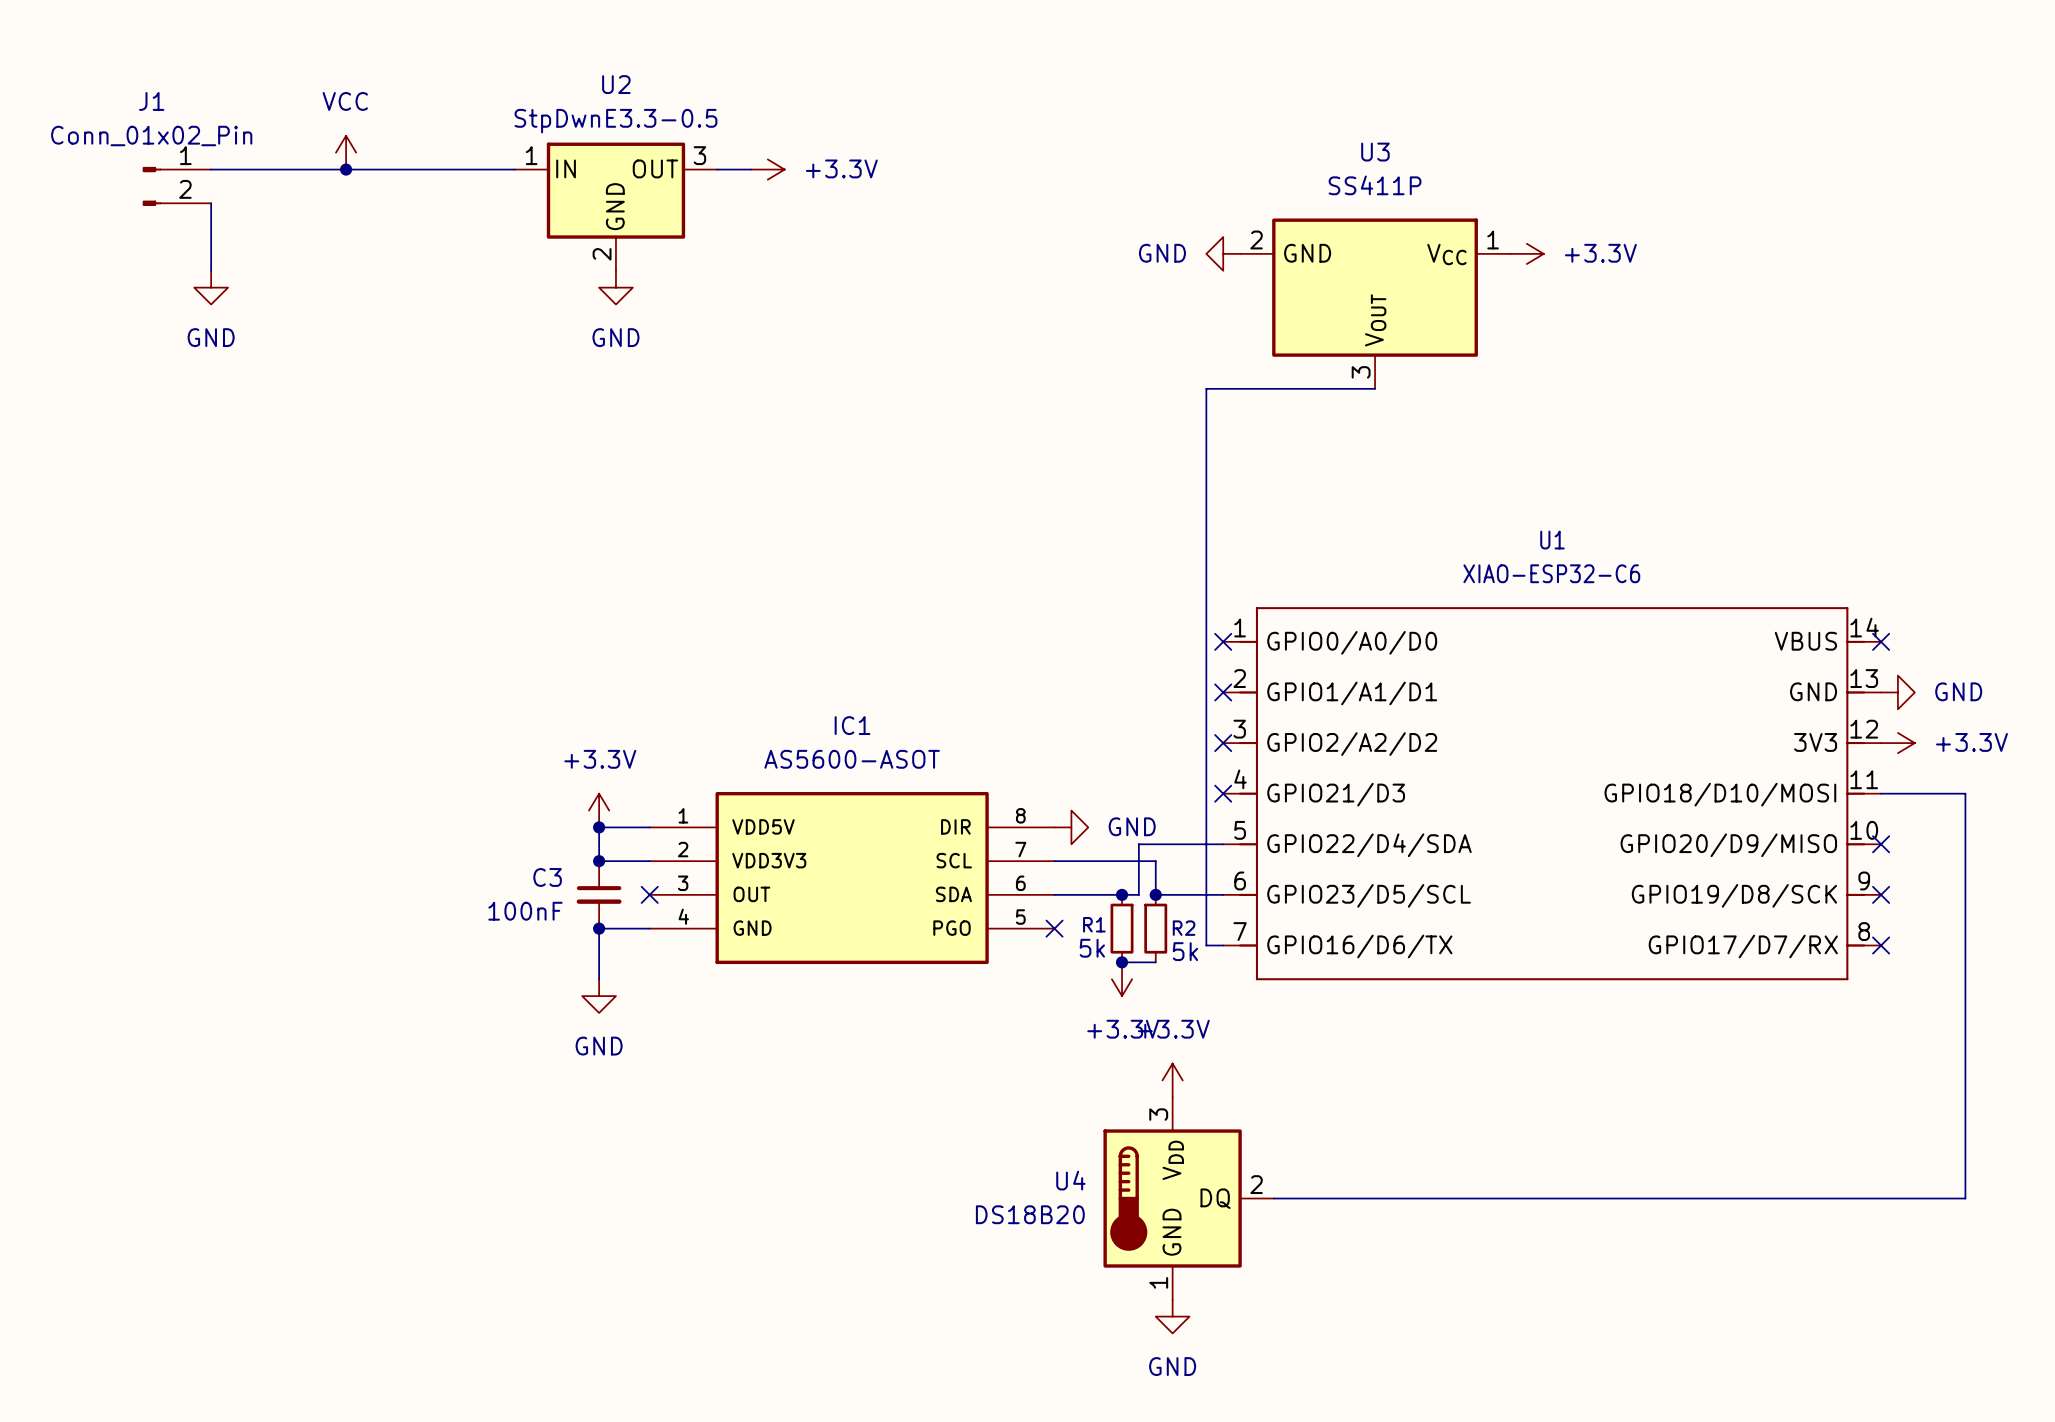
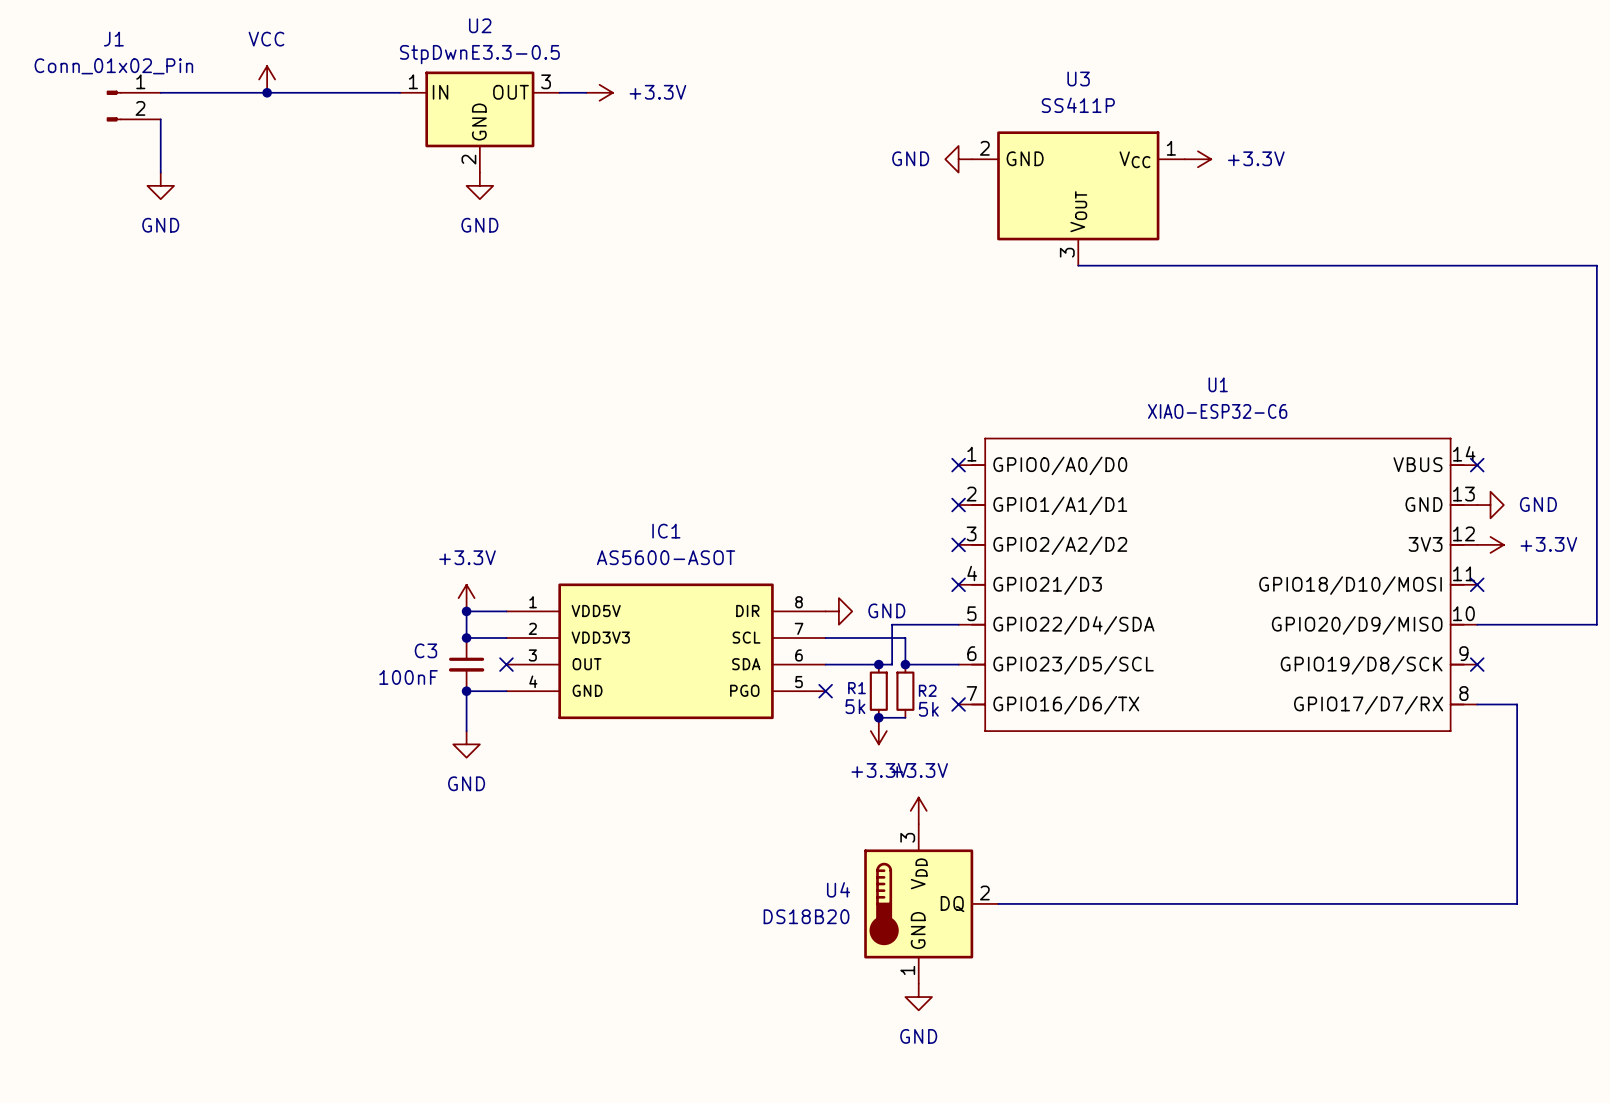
wire: (1375, 388) (1206, 388) (1206, 945) (1223, 945) -> (1078, 265) (1596, 265) (1596, 624) (1477, 624)
wire: (1881, 793) (1965, 793) (1965, 1198) (1931, 1198) -> (1477, 704) (1517, 704) (1517, 903)
no-connect mark position: (1881, 844) -> (1477, 584)
no-connect mark: none -> (958, 704)
no-connect mark: (1881, 945) -> none

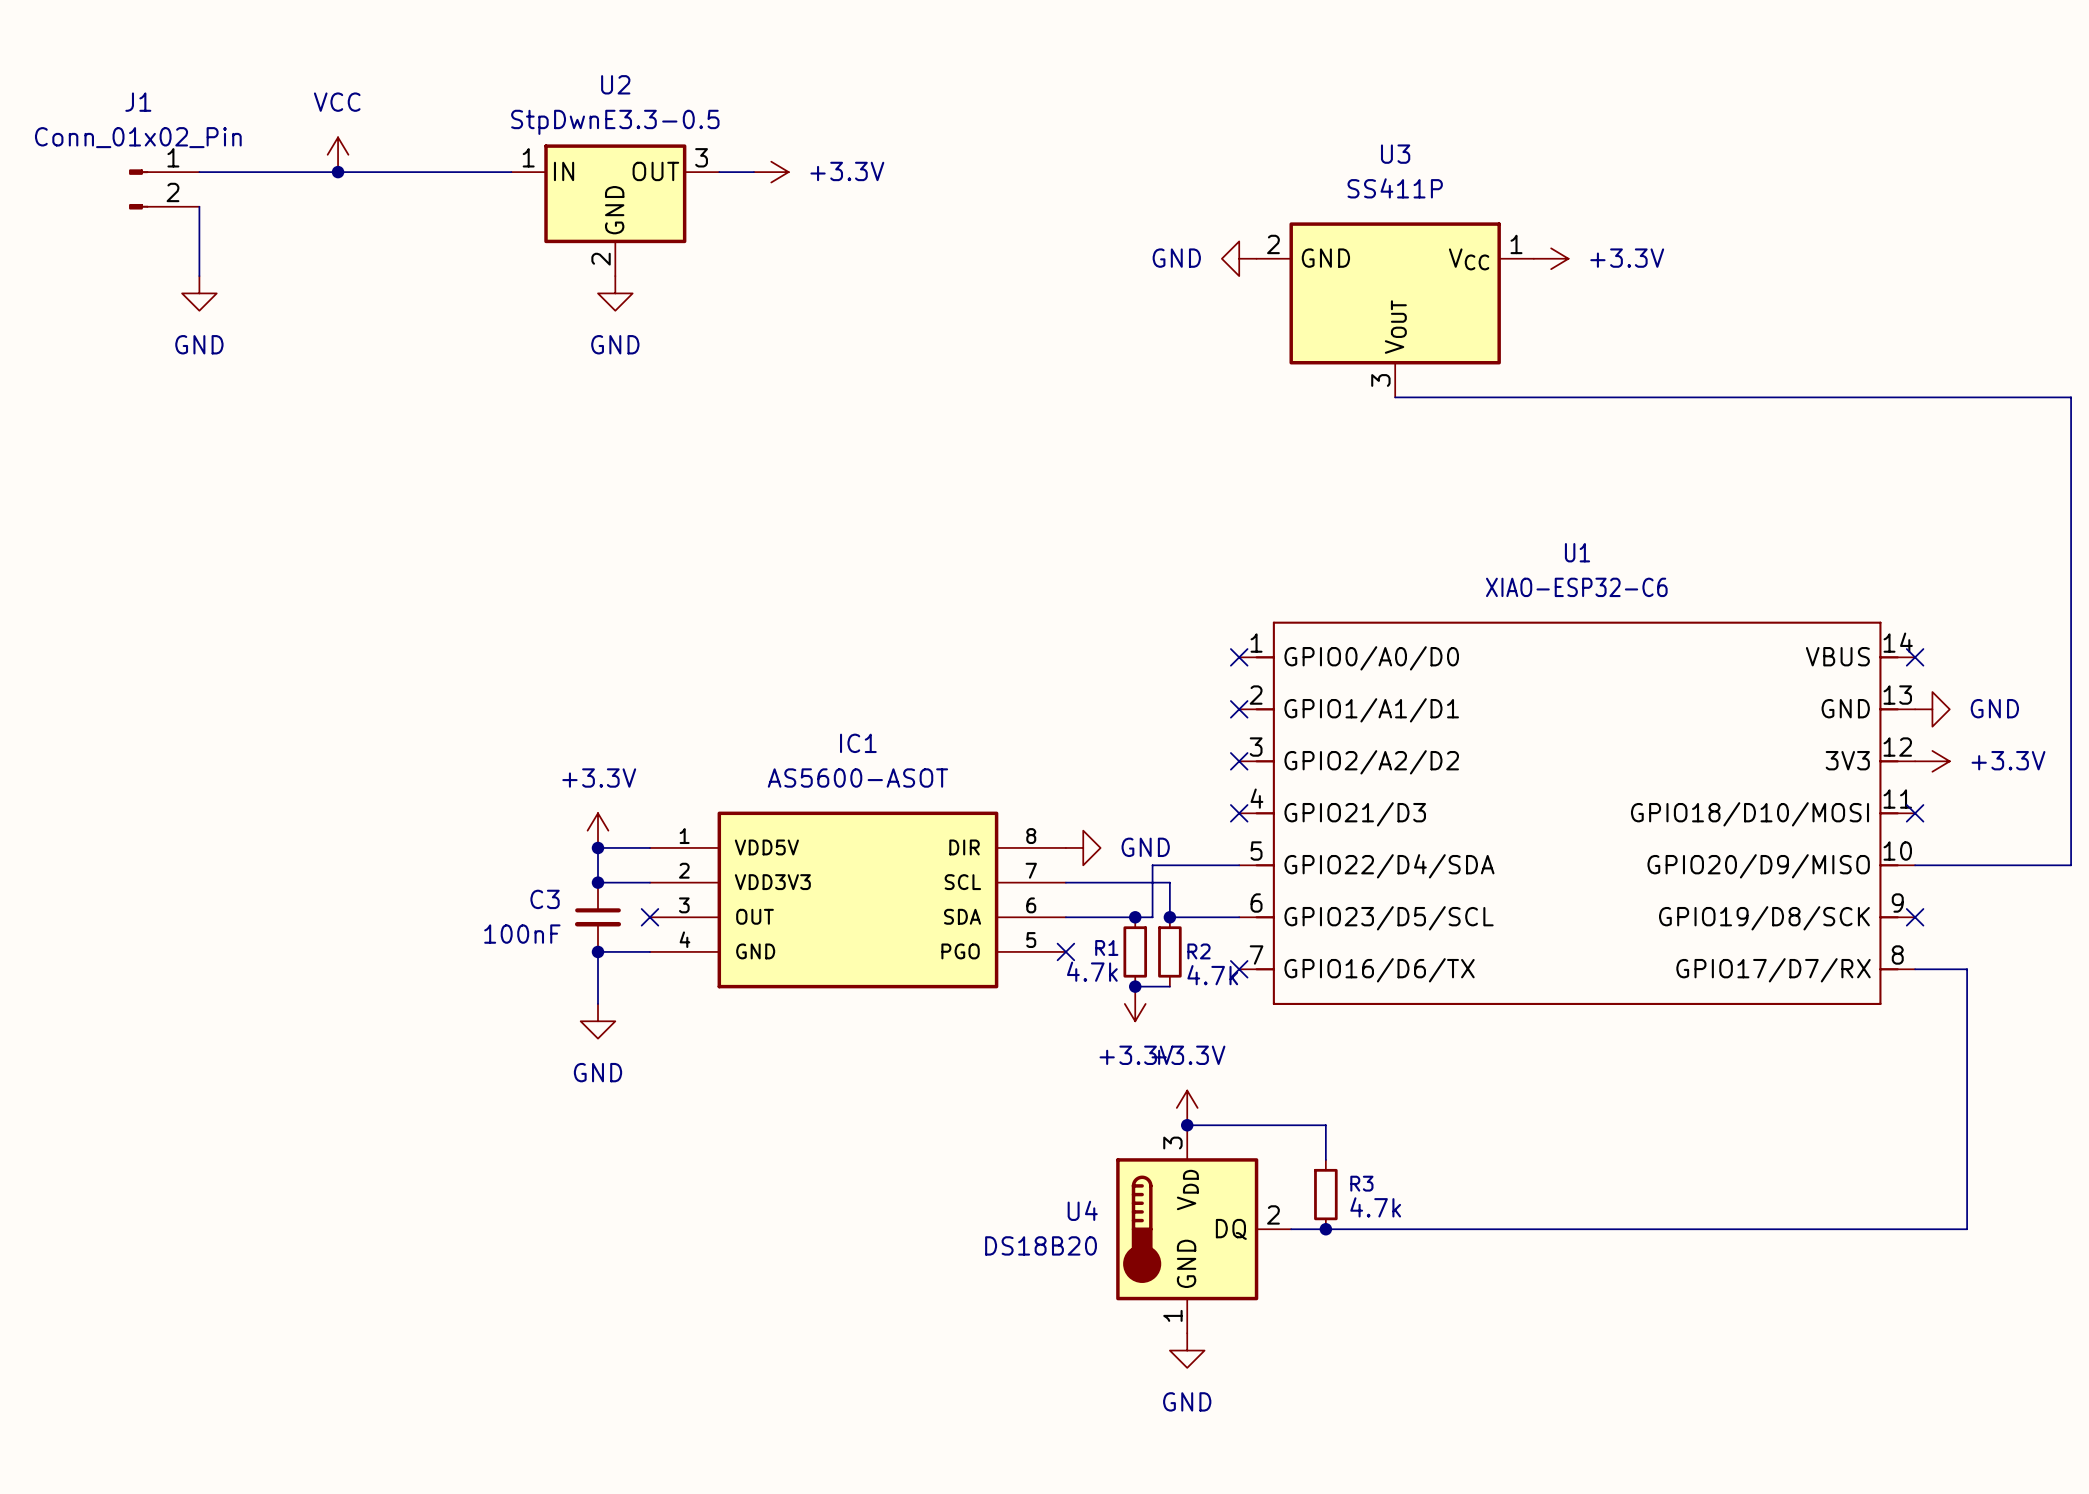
R1 value: 5k (855, 706) -> 4.7k (1092, 971)
R2 value: 5k (928, 709) -> 4.7k (1212, 975)
wire: none -> (1187, 1125) (1325, 1125) (1325, 1159)
junction: none -> (1187, 1125)
R3: none -> 4.7k (1325, 1194)
junction: none -> (1325, 1229)

